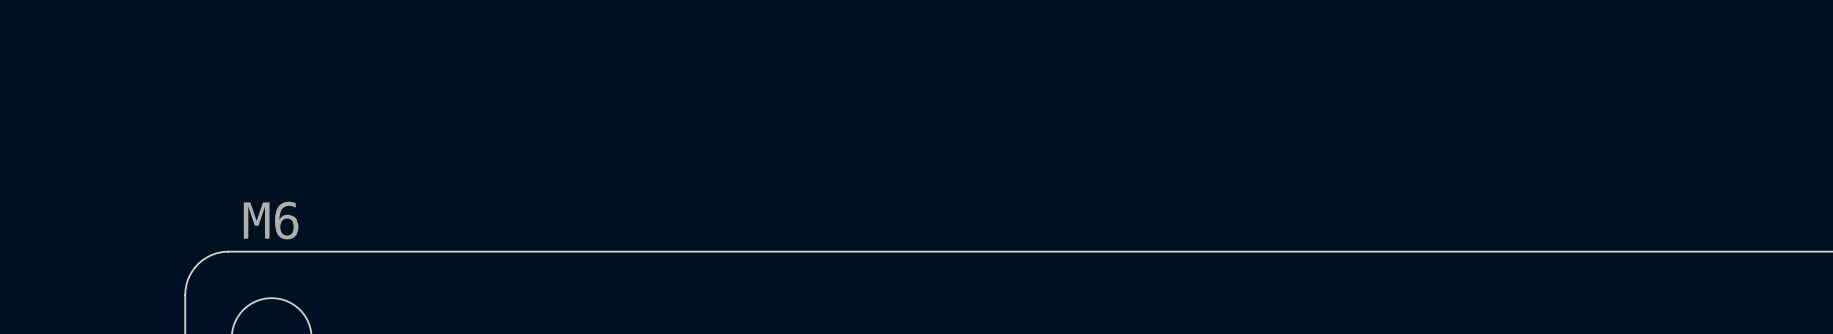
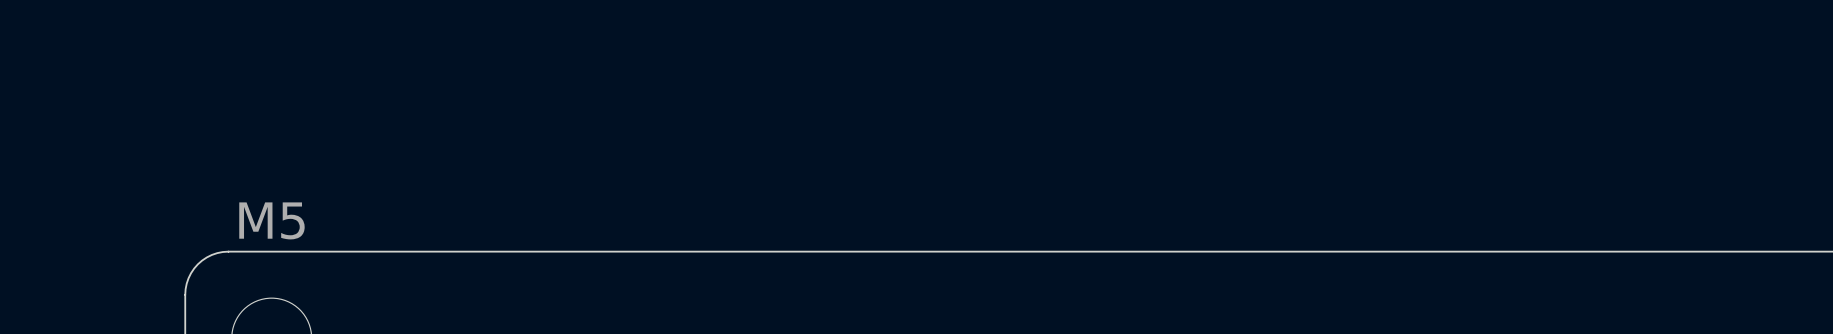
M6 name: M6 (271, 220) -> M5 (271, 220)

